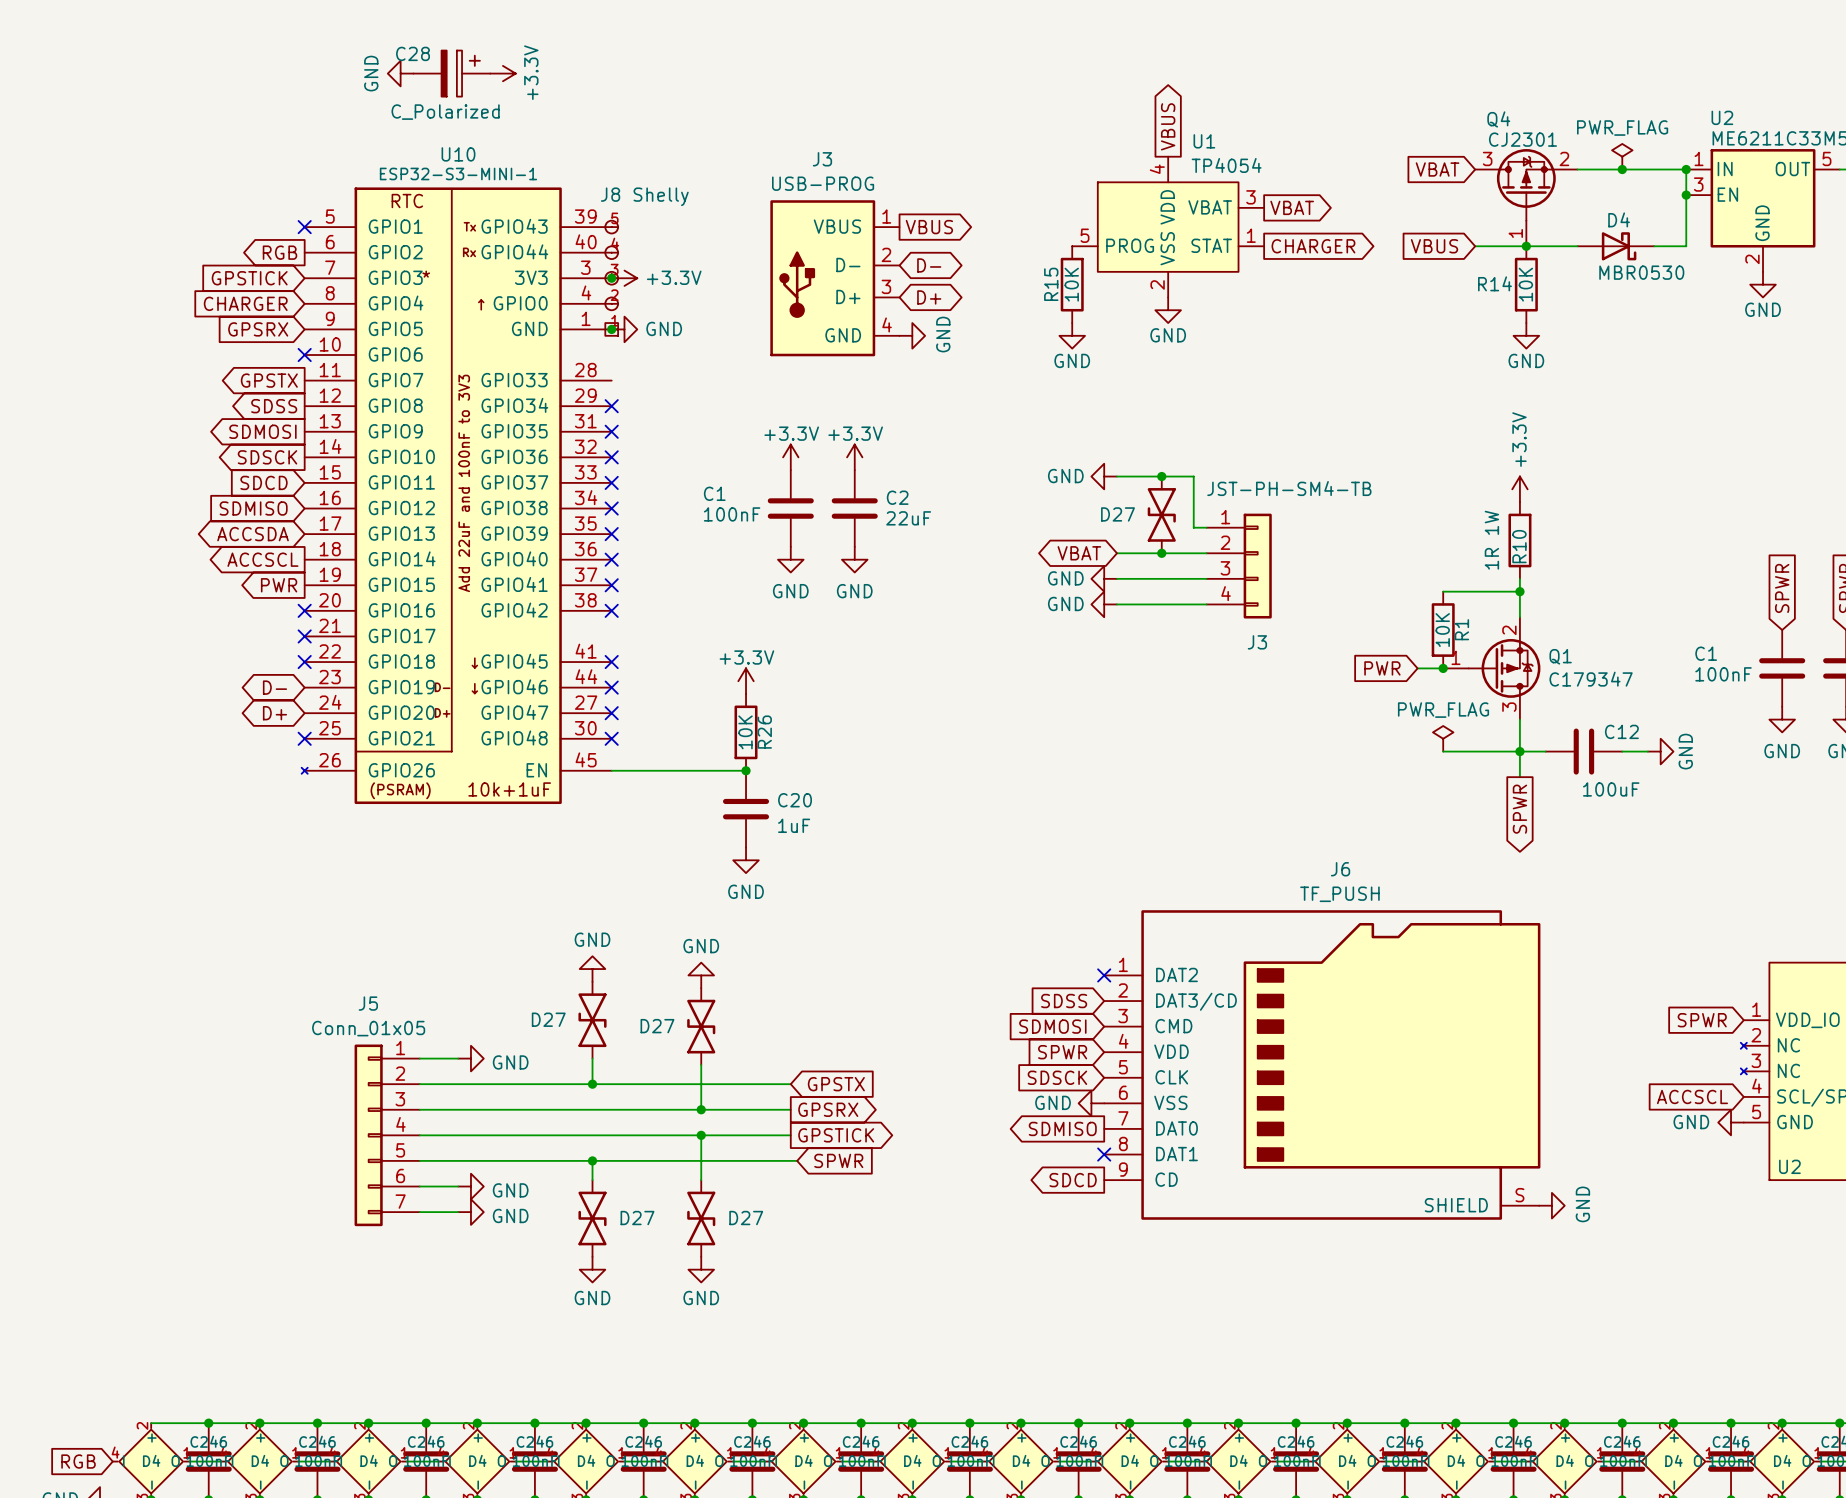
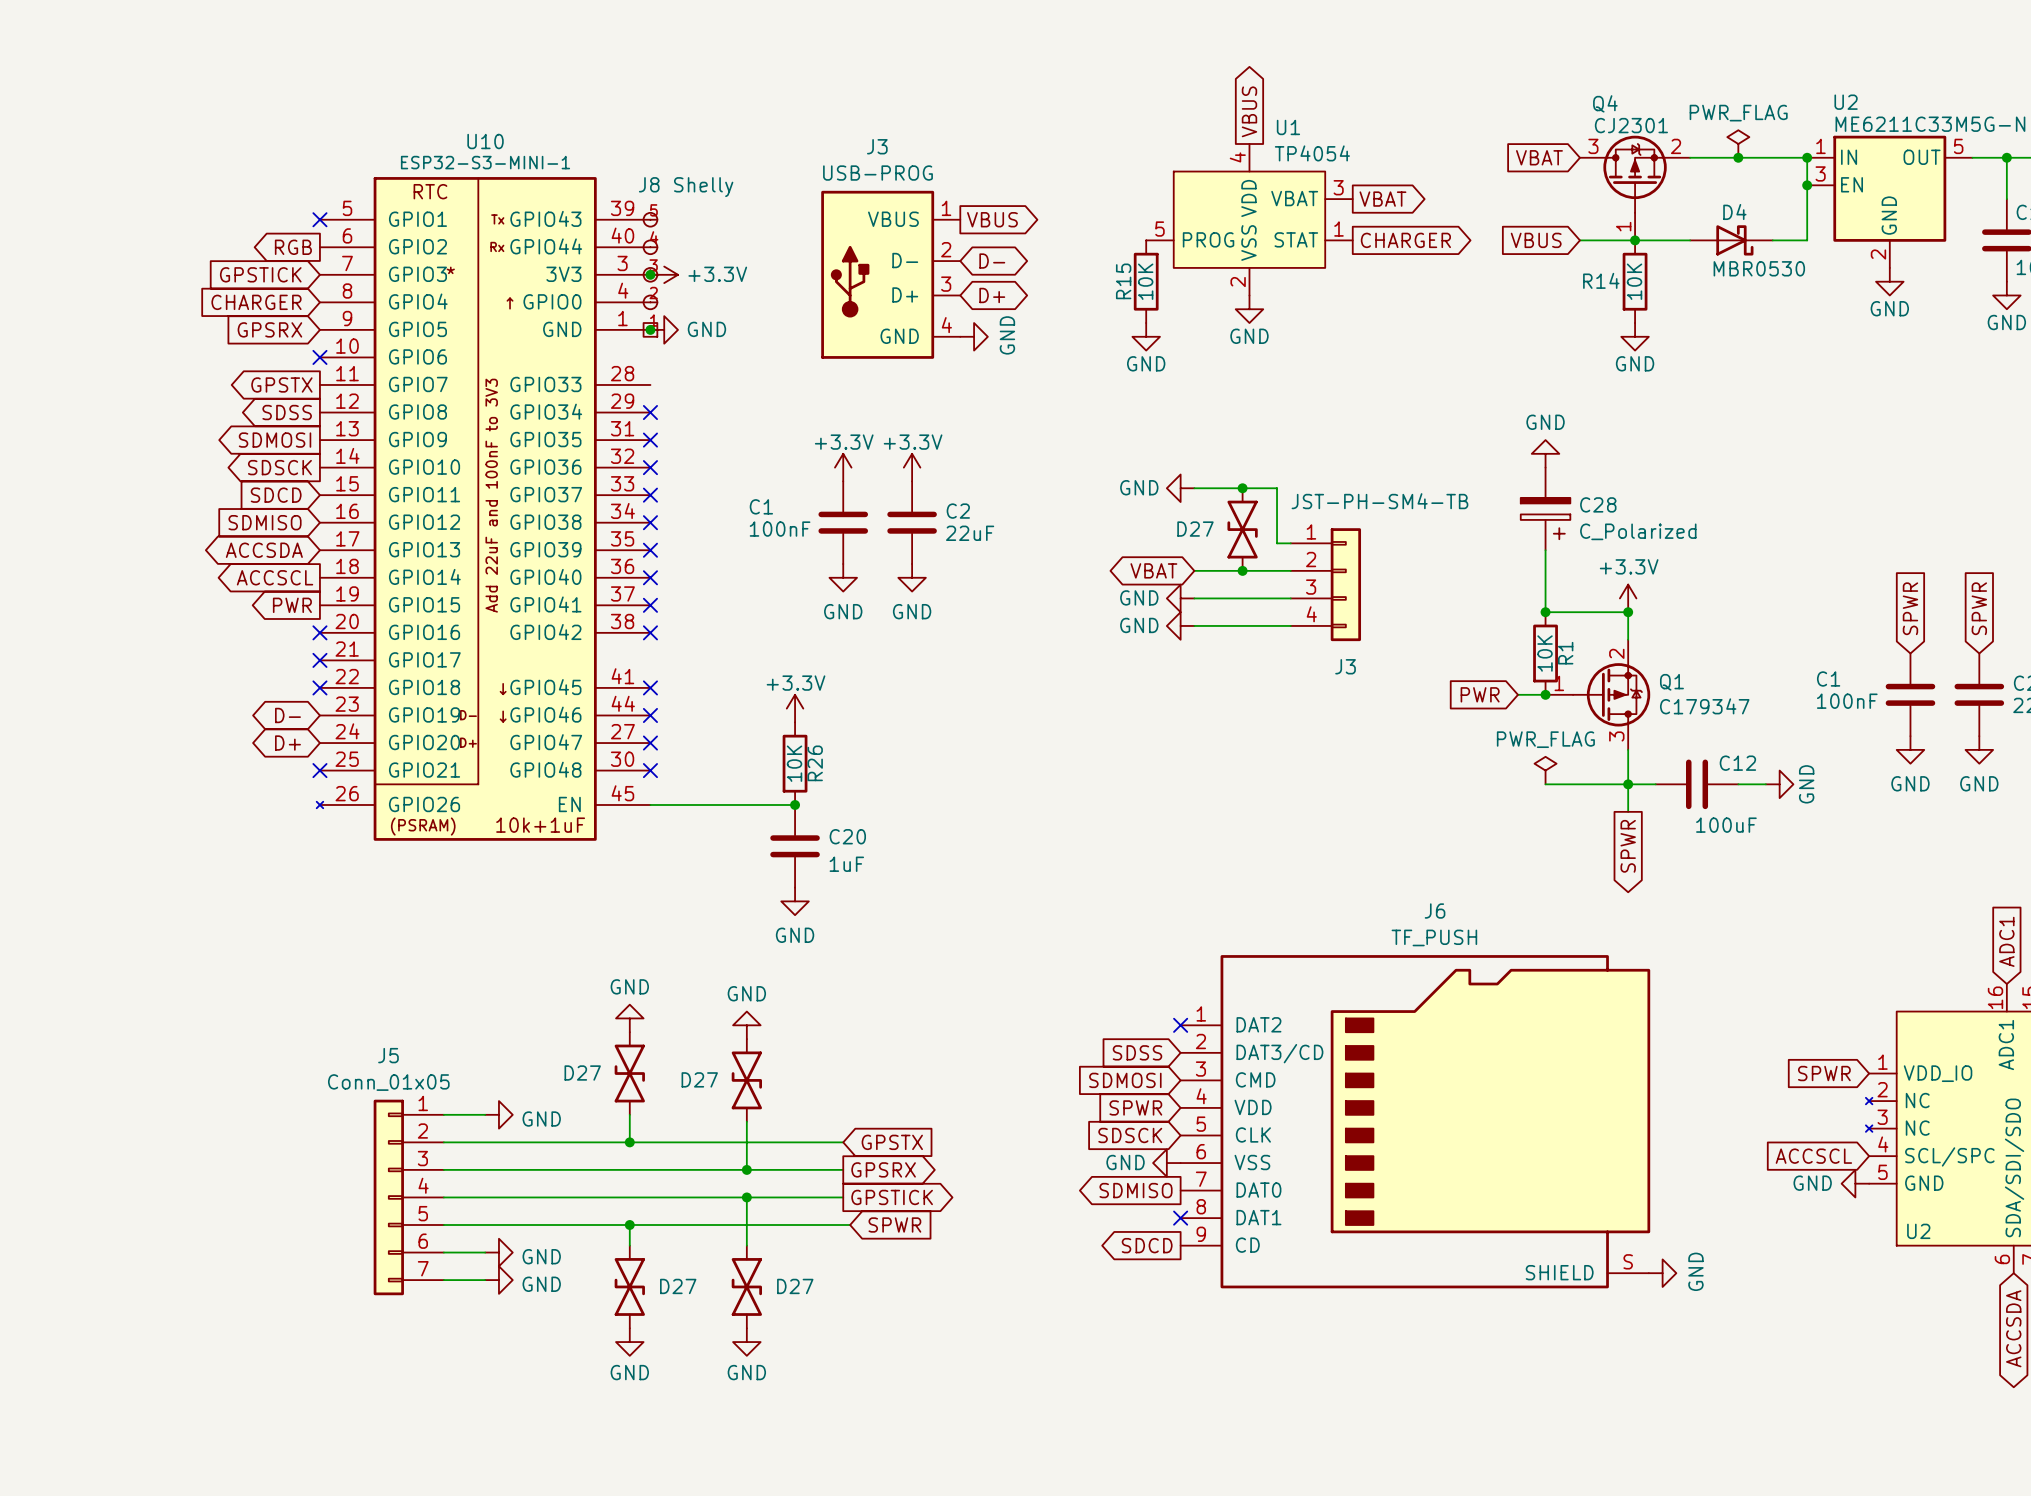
C28 name position: C28 (413, 53) -> C28 (1598, 504)
power symbol: GND (400, 73) -> none
C28 position: (451, 73) -> (1545, 508)
C28 rotation: 0° (460, 73) -> 90° clockwise (1545, 518)
power symbol: +3.3V (502, 73) -> none
C28 value position: C_Polarized (445, 112) -> C_Polarized (1638, 531)
power symbol text rotation: 0° (1519, 439) -> 90° clockwise (1629, 566)
power symbol: none -> GND (1545, 453)
power symbol position: +3.3V (1519, 489) -> +3.3V (1628, 598)
wire: none -> (1545, 550) (1545, 612)
R10: 1R 1W (1519, 540) -> none
junction: none -> (1545, 612)

